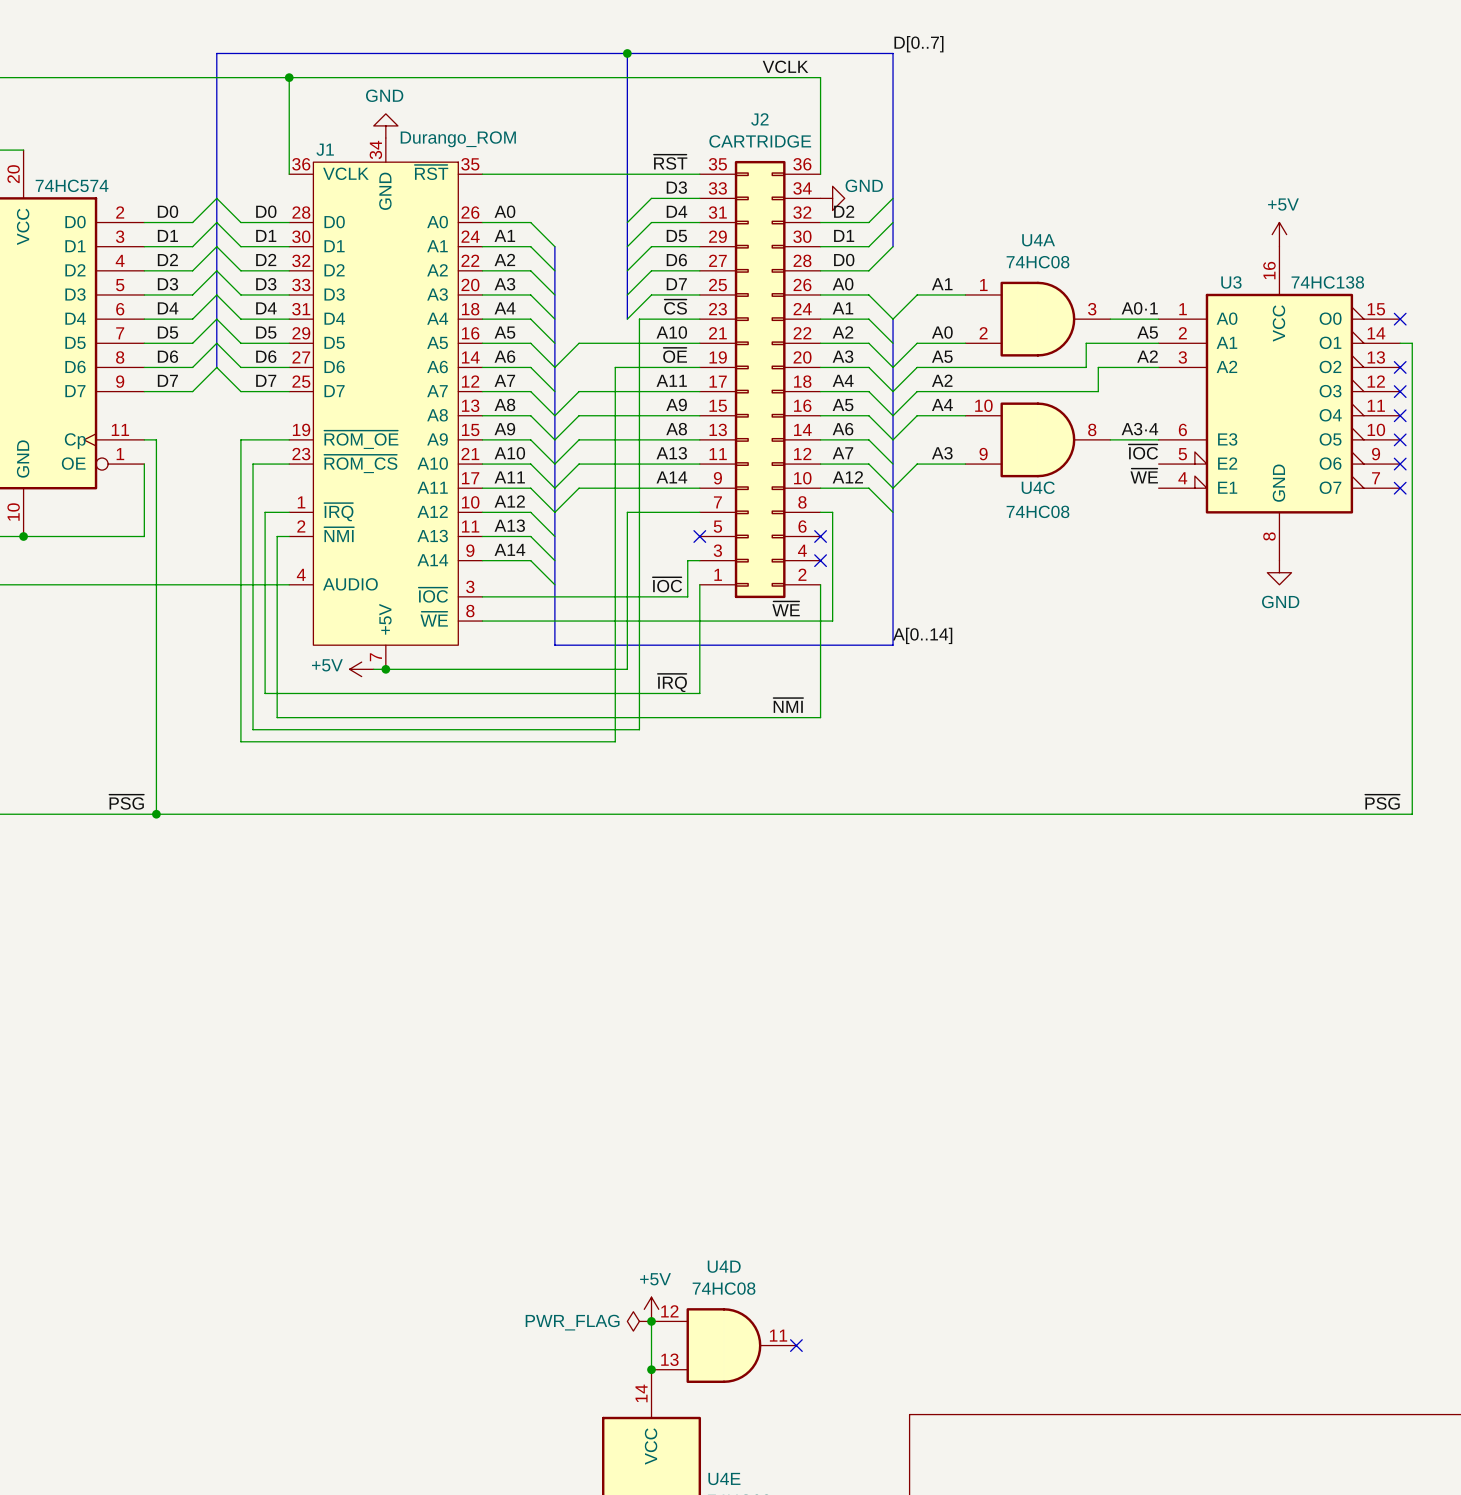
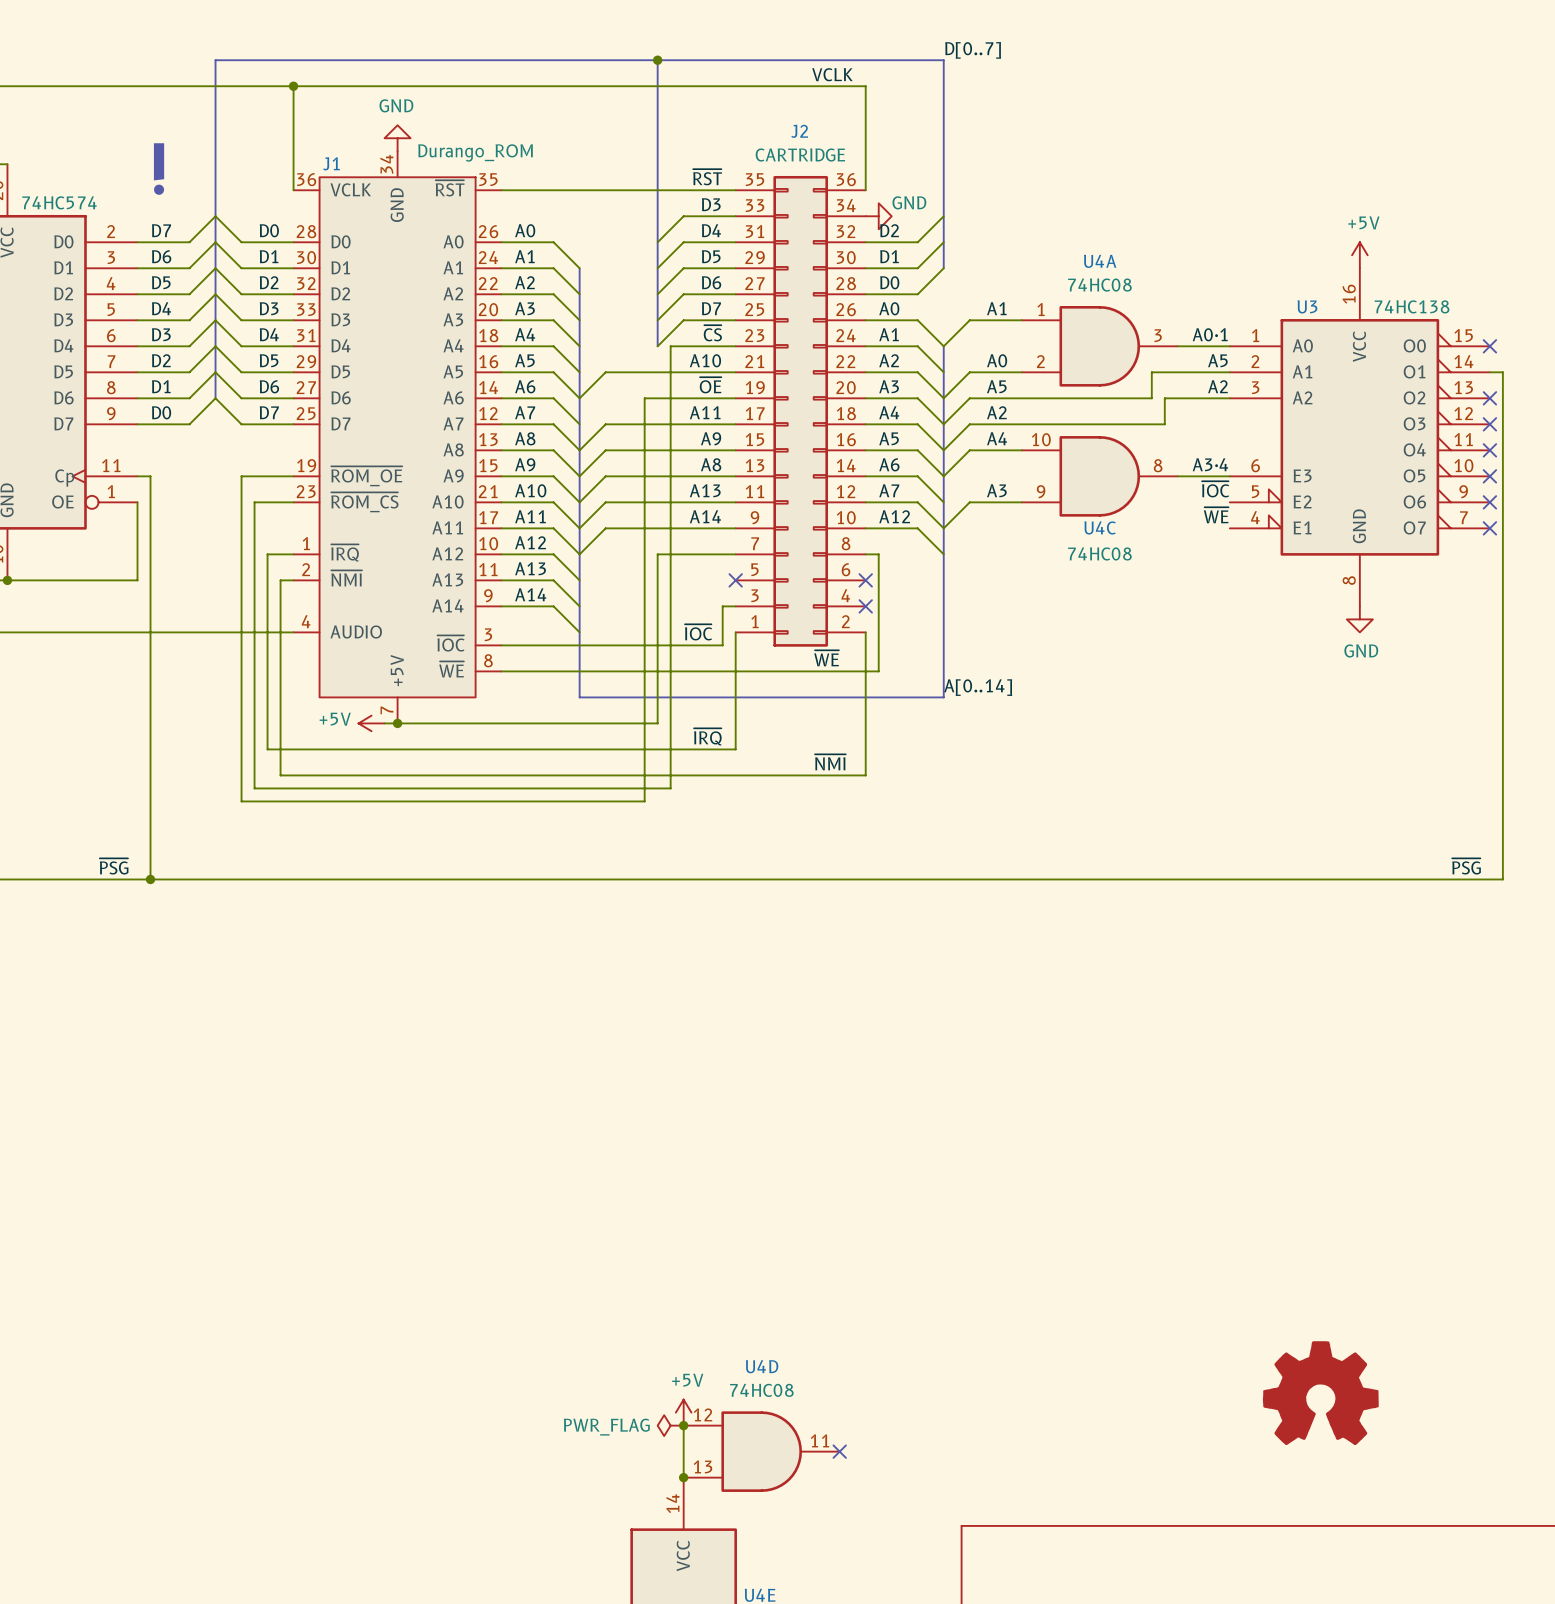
text: none -> ! (159, 169)
label: D0 (168, 211) -> D7 (161, 230)
label: D1 (167, 235) -> D6 (161, 256)
label: D2 (167, 259) -> D5 (161, 282)
label: D3 (167, 284) -> D4 (161, 308)
label: D4 (168, 308) -> D3 (161, 334)
label: D5 (167, 332) -> D2 (161, 360)
label: D6 (167, 356) -> D1 (161, 386)
label: D7 (167, 380) -> D0 (161, 412)
part: none -> (1320, 1393)

